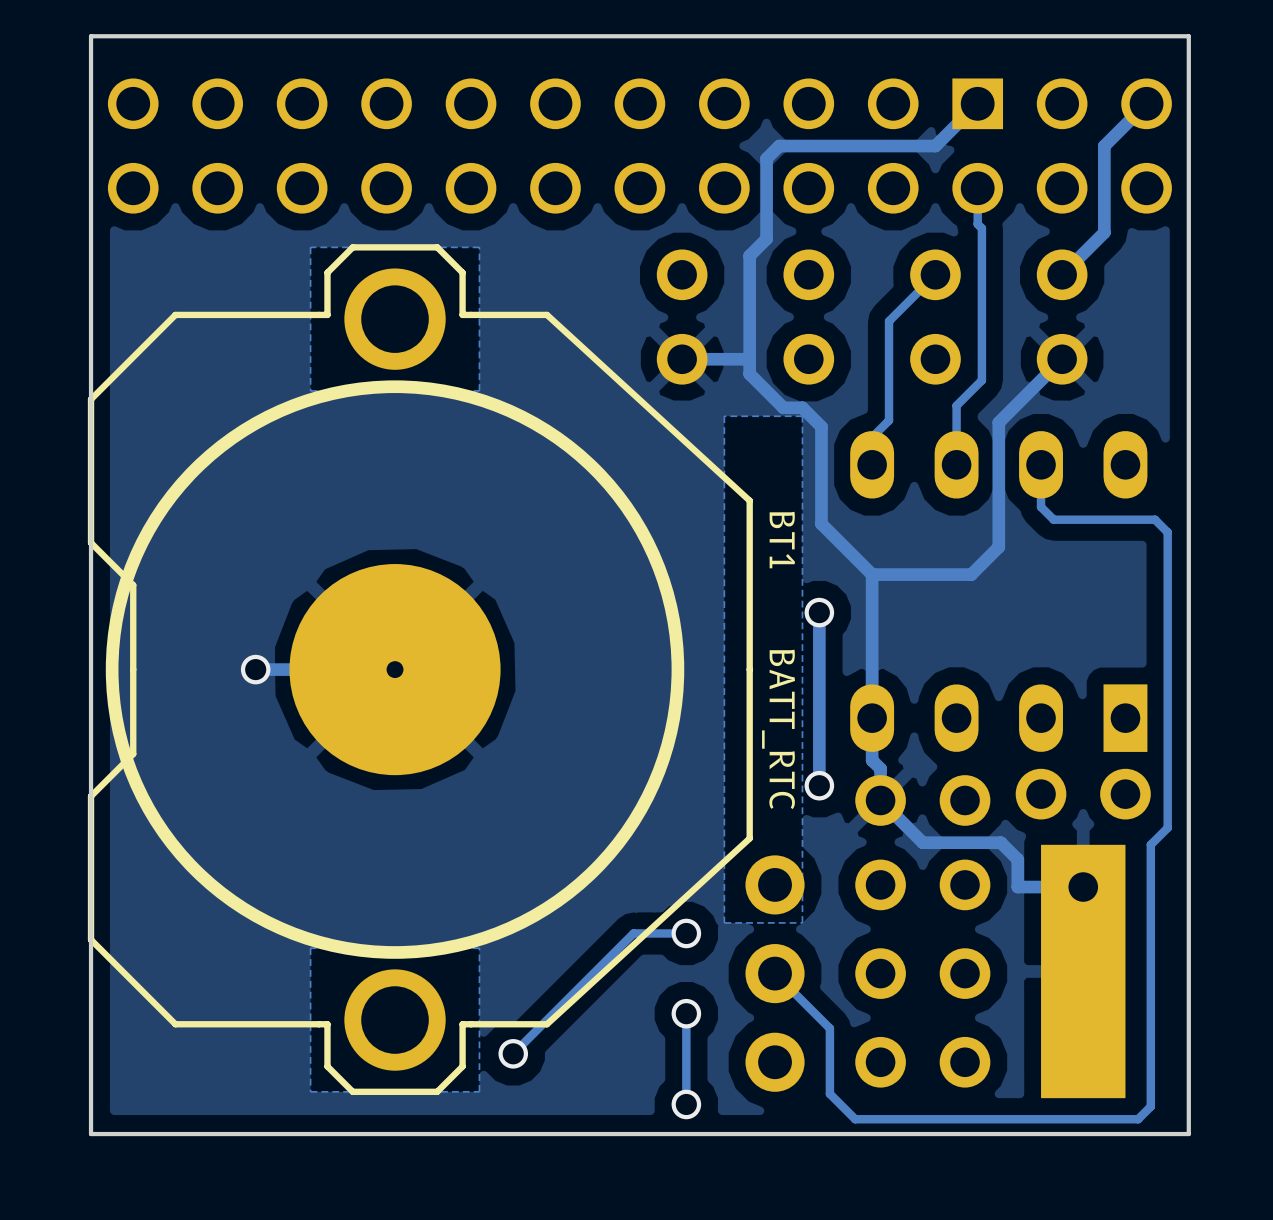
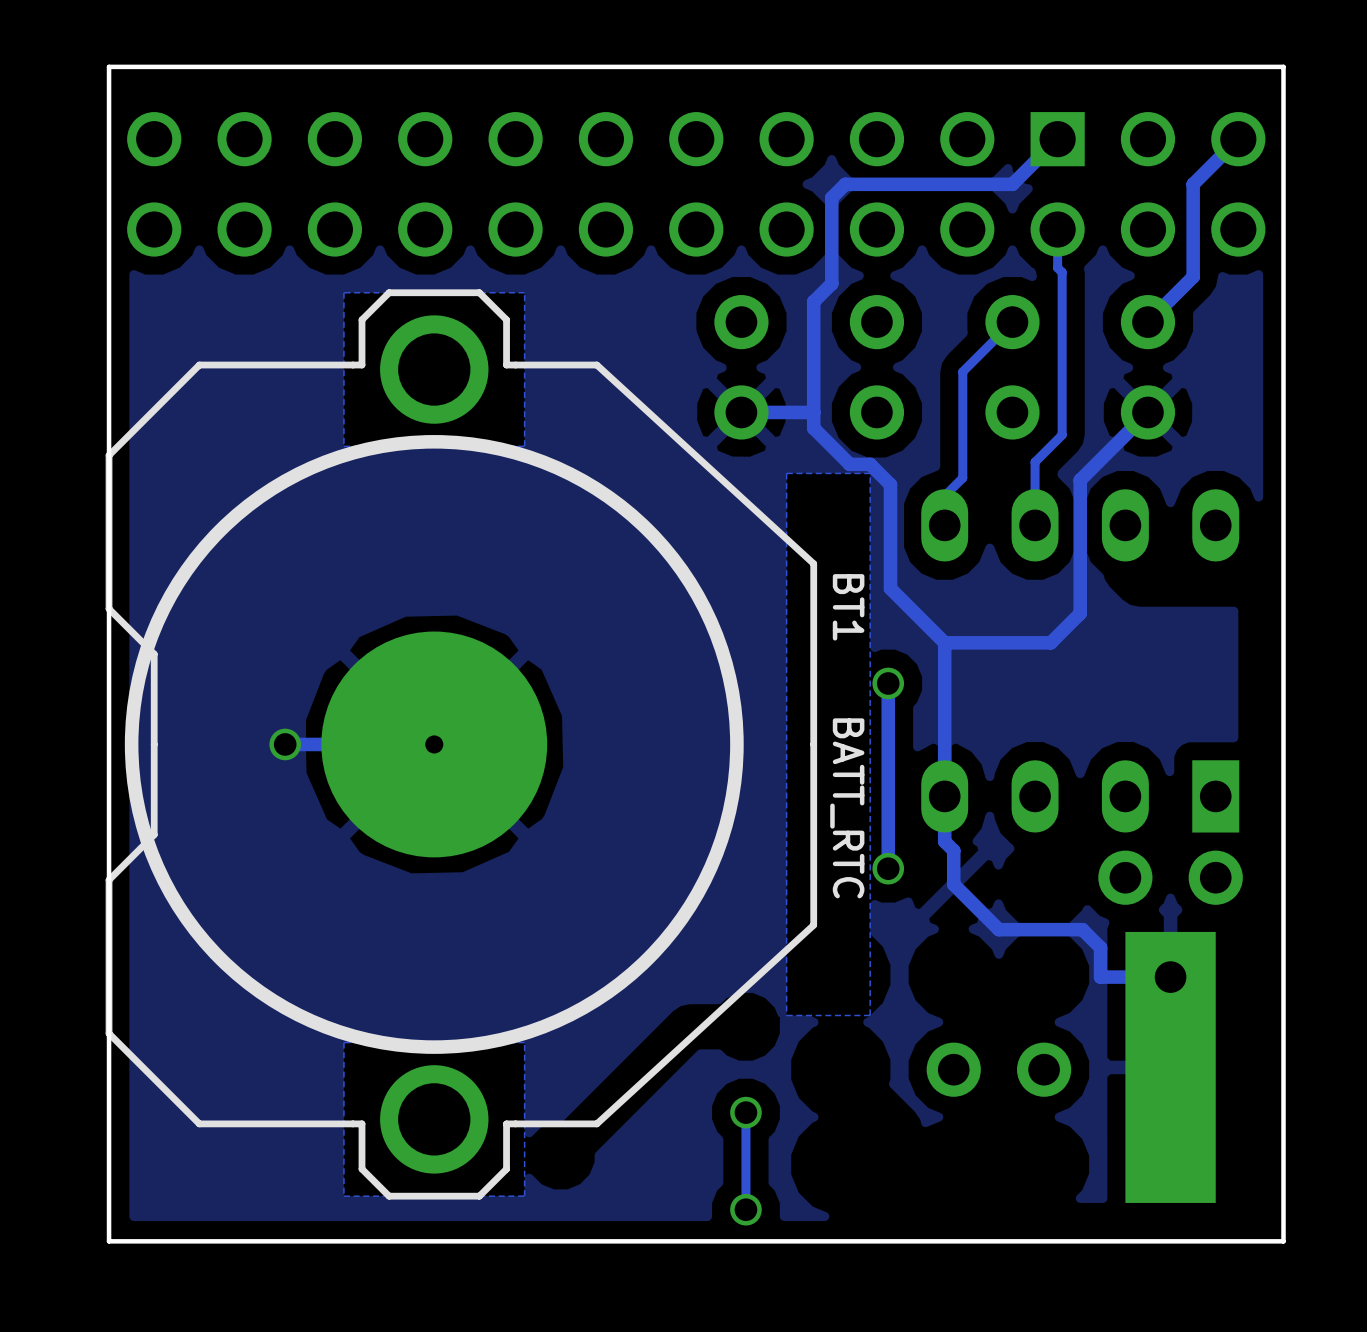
track: (1041, 464) (1041, 507) (1053, 519) (1155, 519) (1167, 532) (1167, 827) (1150, 844) (1150, 1106) (1138, 1119) (855, 1119) (829, 1093) (829, 1028) (775, 973) -> none
part: (922, 800) -> none
part: (775, 884) -> none
part: (922, 884) -> none
track: (686, 933) (633, 933) (513, 1053) -> none
via: (686, 933) -> none
part: (775, 973) -> none
via: (513, 1053) -> none
part: (775, 1062) -> none
part: (922, 1062) -> none

